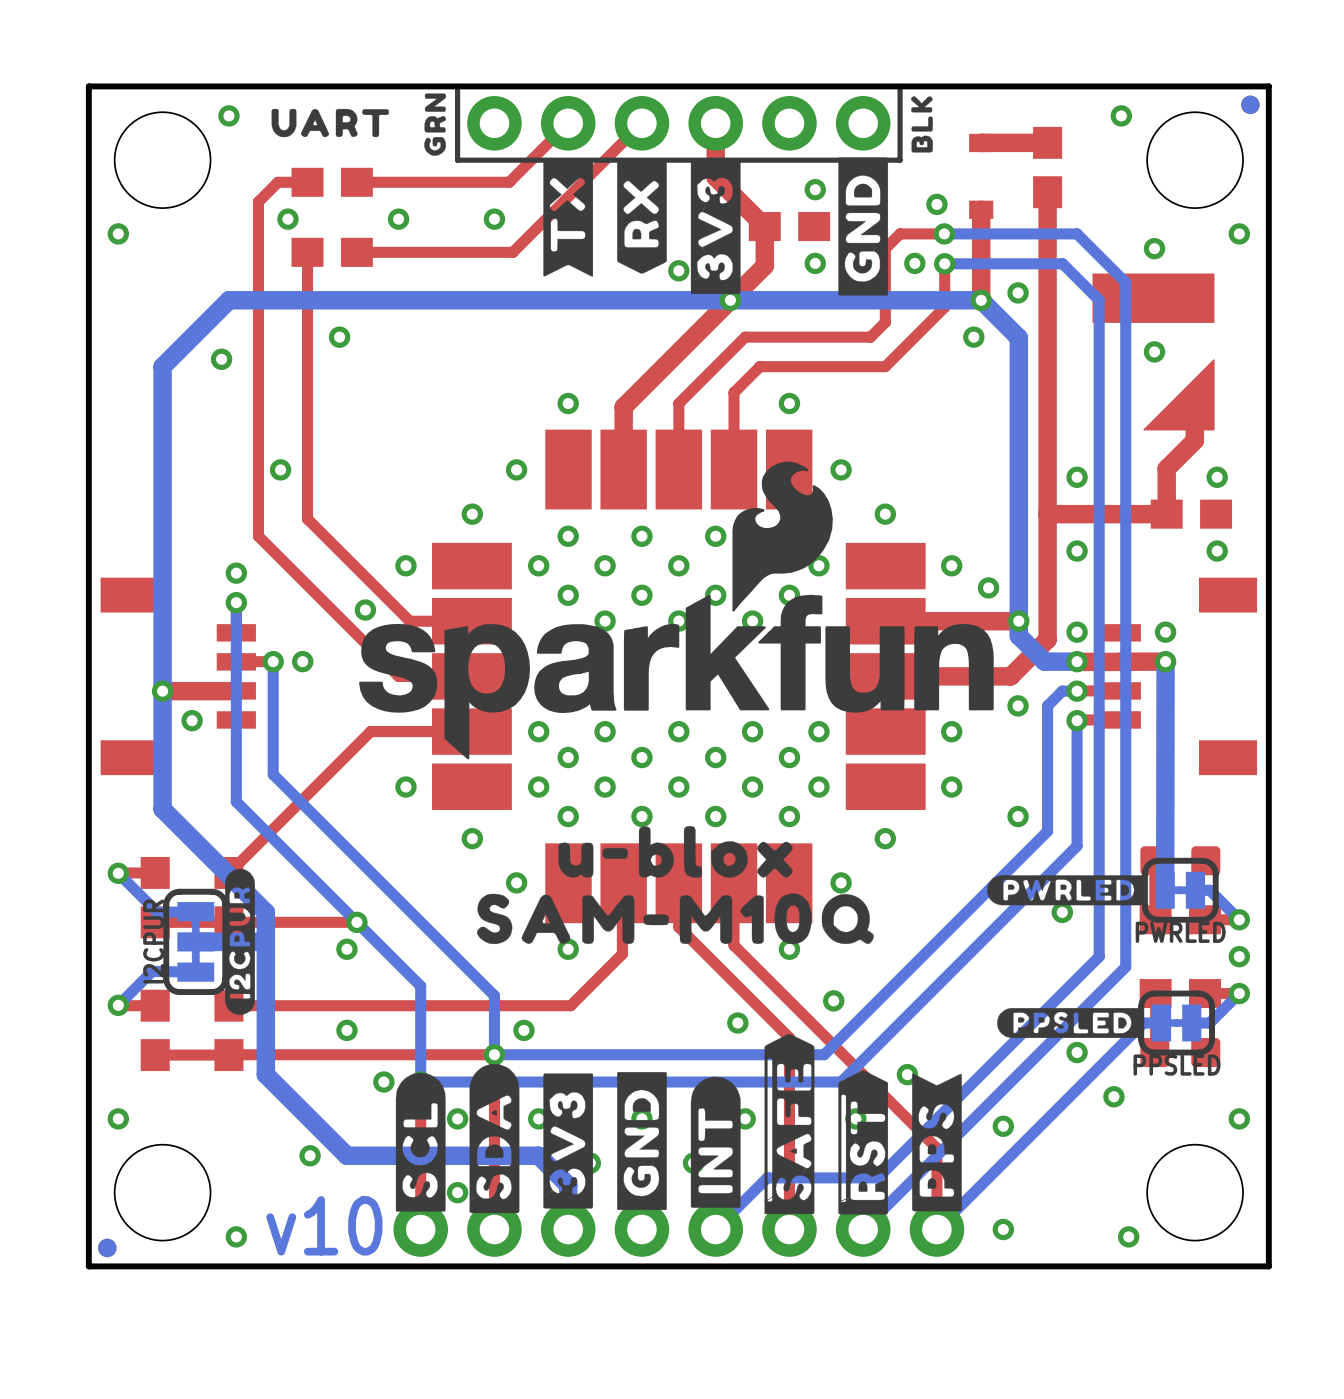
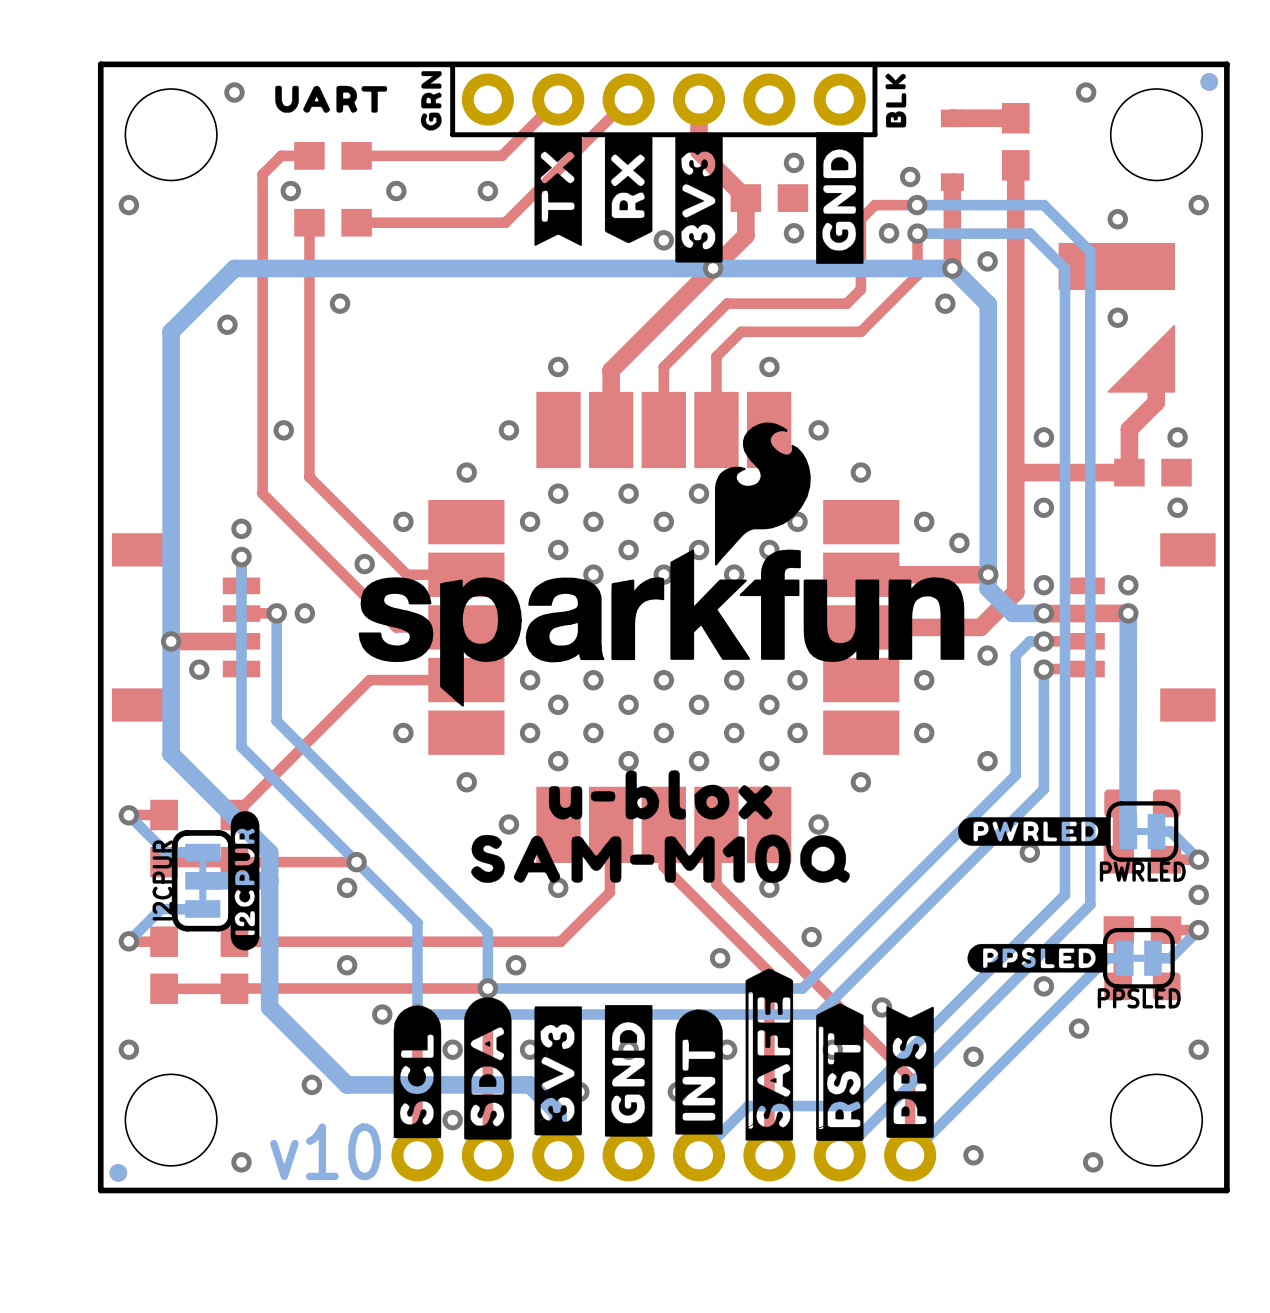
PWRLED footprint: [1141, 857, 1219, 923] -> [1106, 801, 1179, 862]
I2CPUR footprint: [163, 888, 229, 996] -> [171, 830, 234, 932]
PPSLED footprint: [1138, 990, 1215, 1056] -> [1103, 927, 1175, 989]

